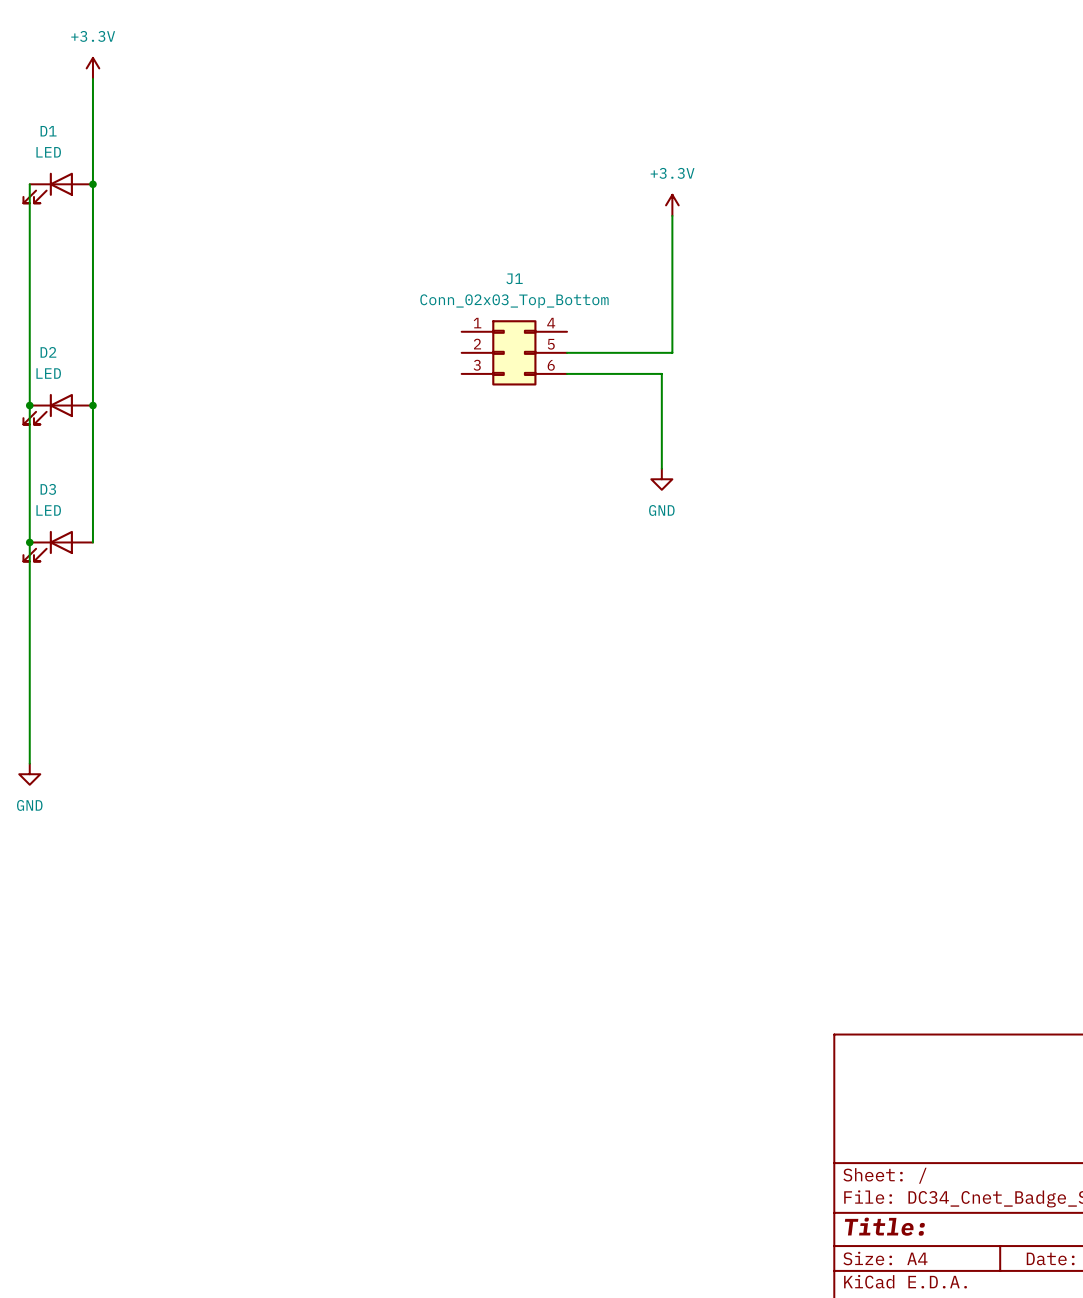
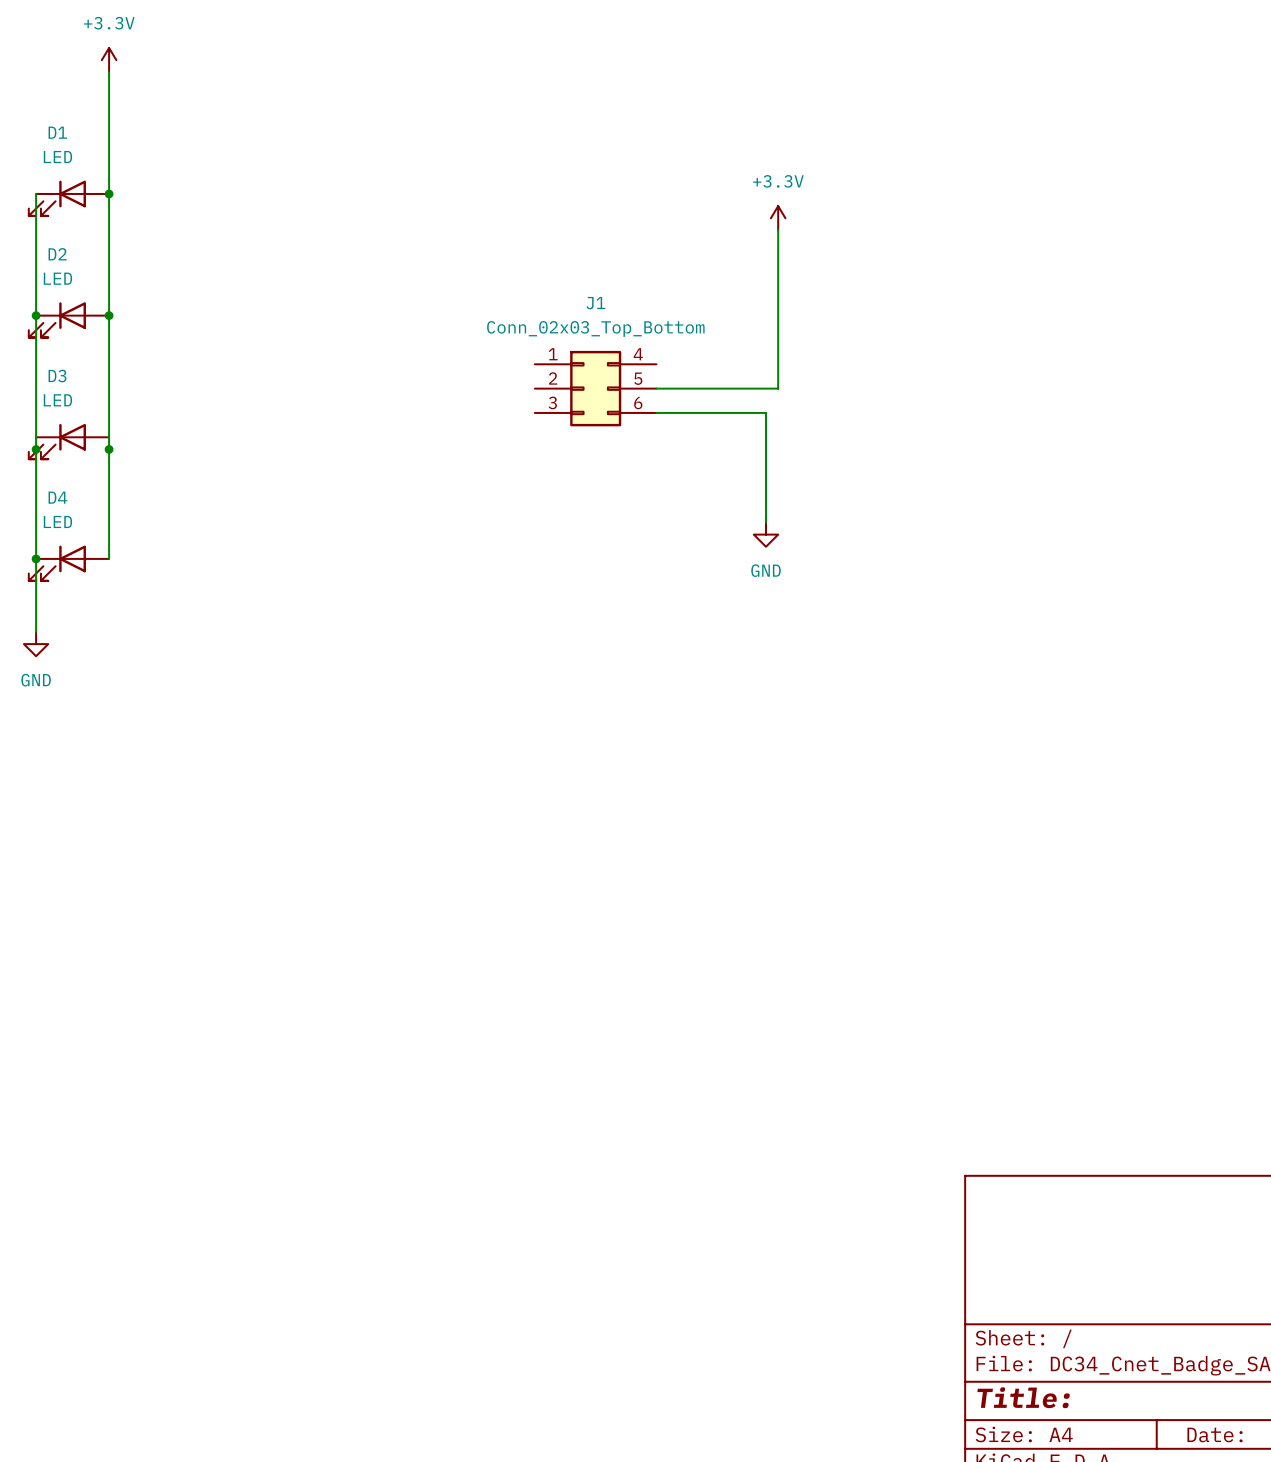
junction: none -> (36, 315)
junction: none -> (109, 315)
D2 position: (58, 409) -> (68, 319)
wire: (92, 500) (92, 542) -> none
D4: none -> LED (68, 563)
junction position: (29, 542) -> (36, 558)
D3 position: (58, 546) -> (68, 441)
wire: (29, 563) (29, 763) -> none
power symbol position: GND (29, 774) -> GND (36, 644)

